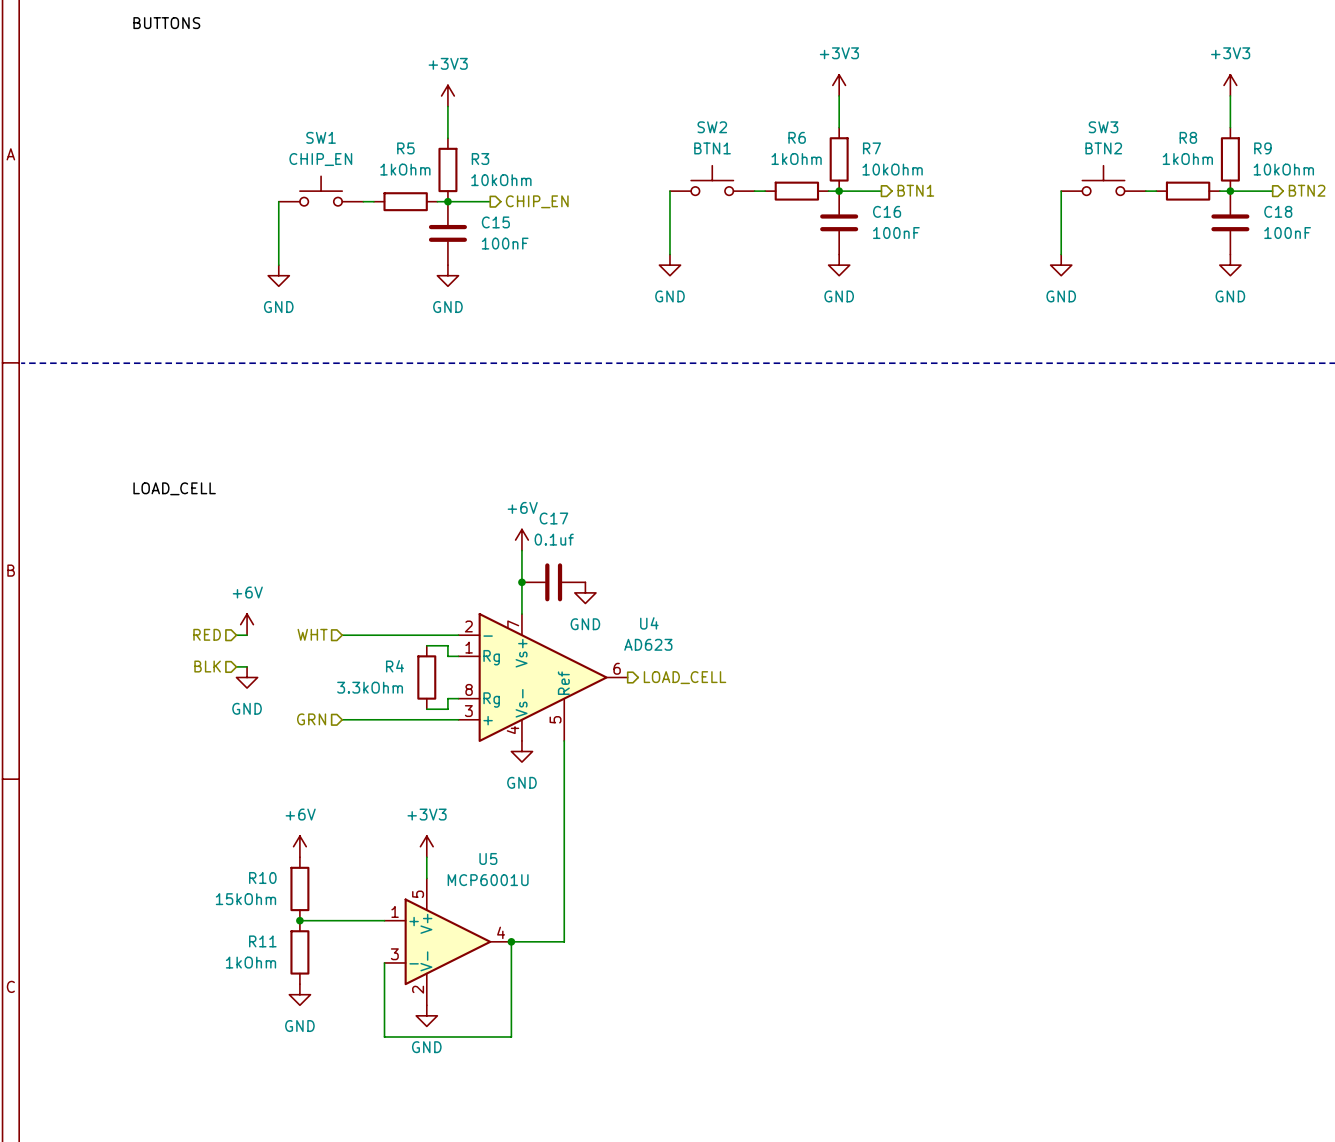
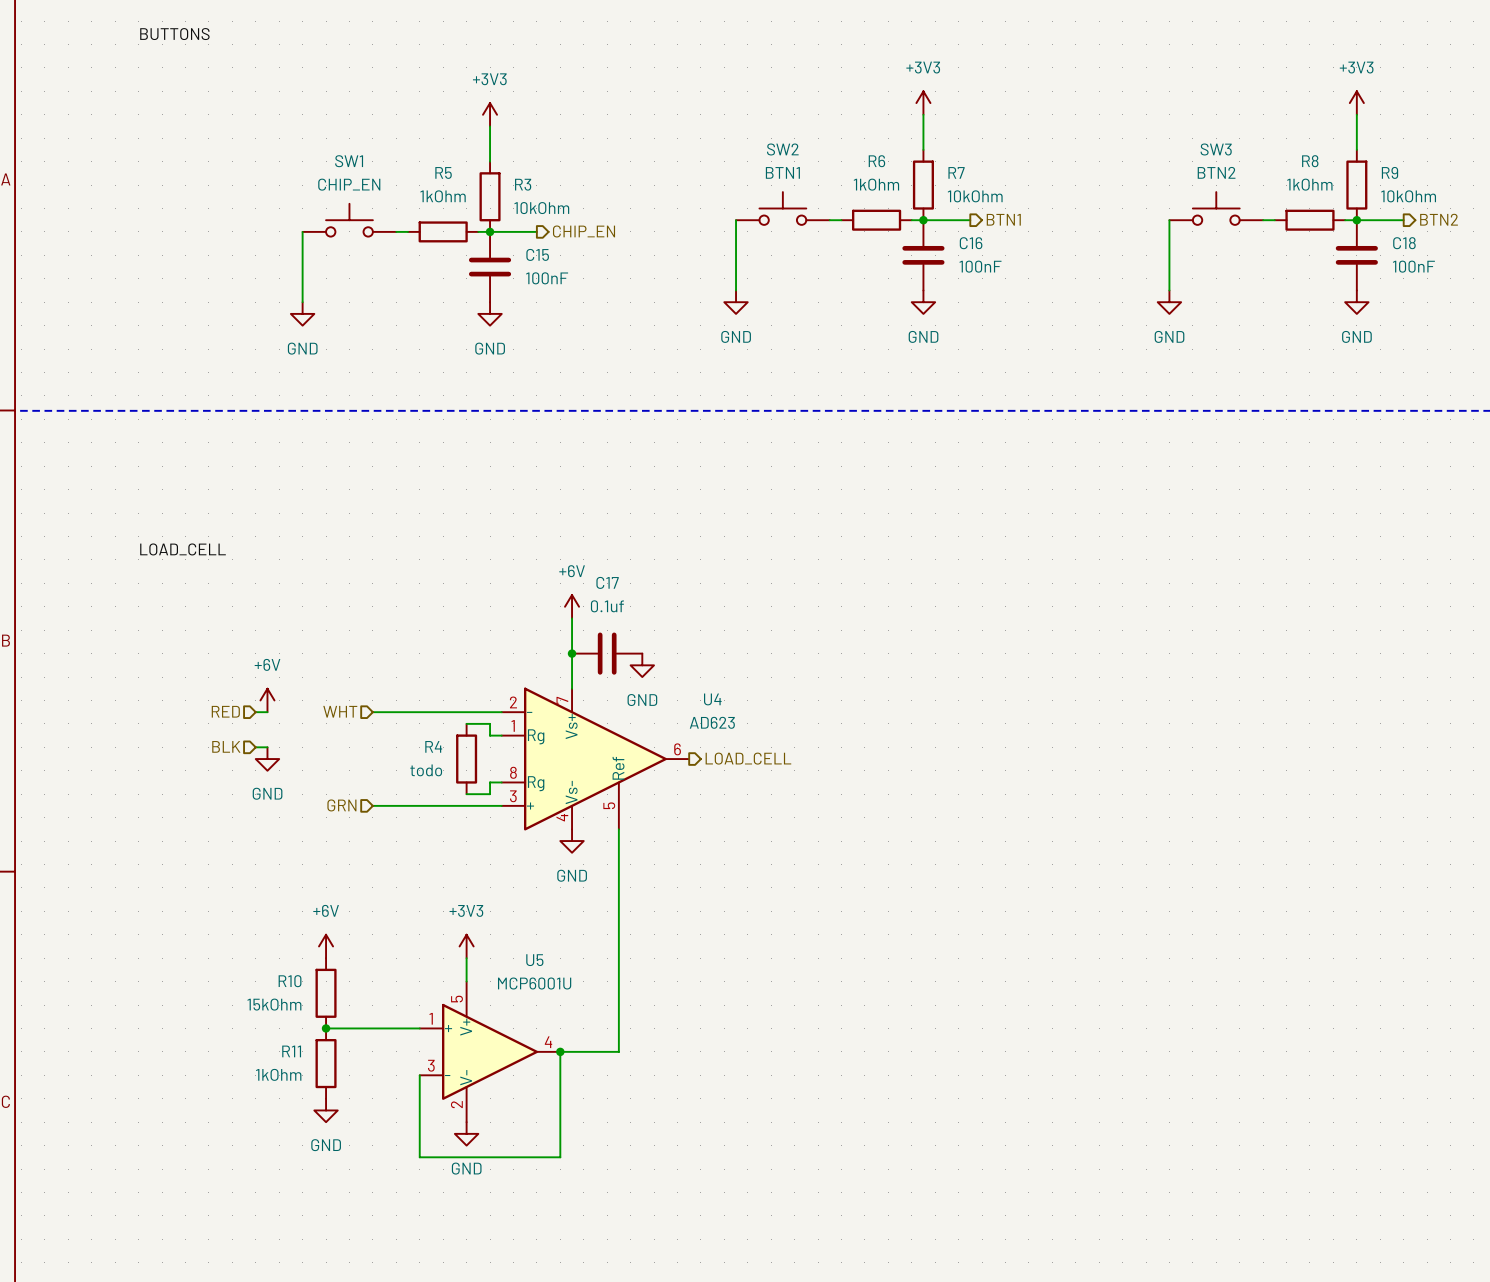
R4 value: 3.3kOhm (370, 687) -> todo (426, 770)

